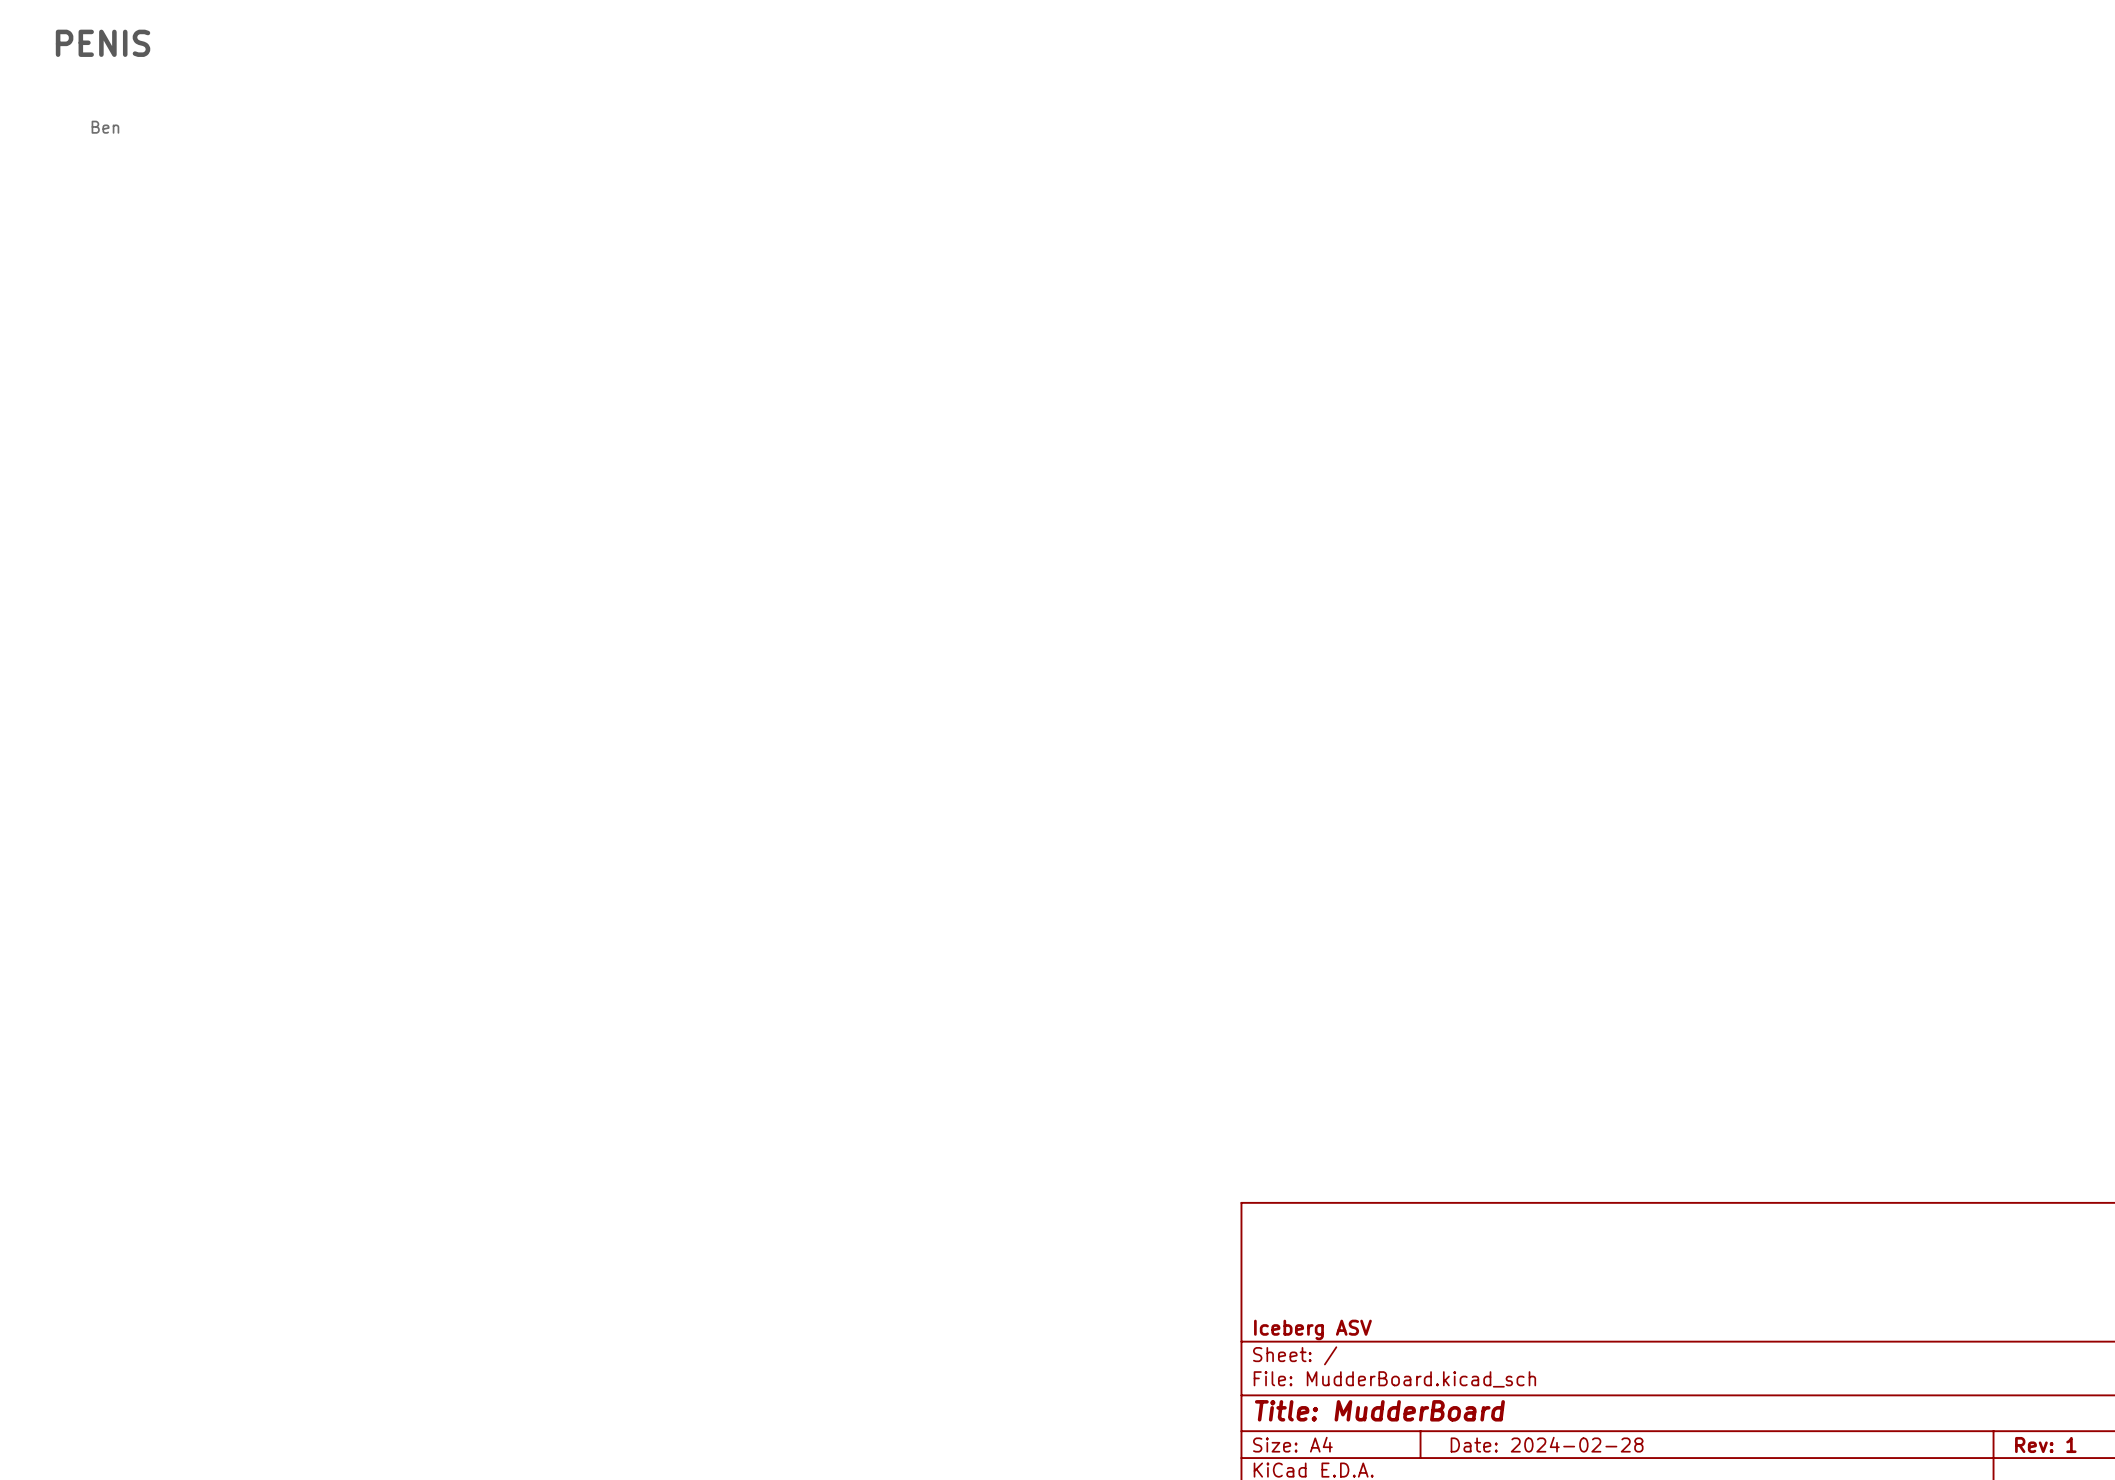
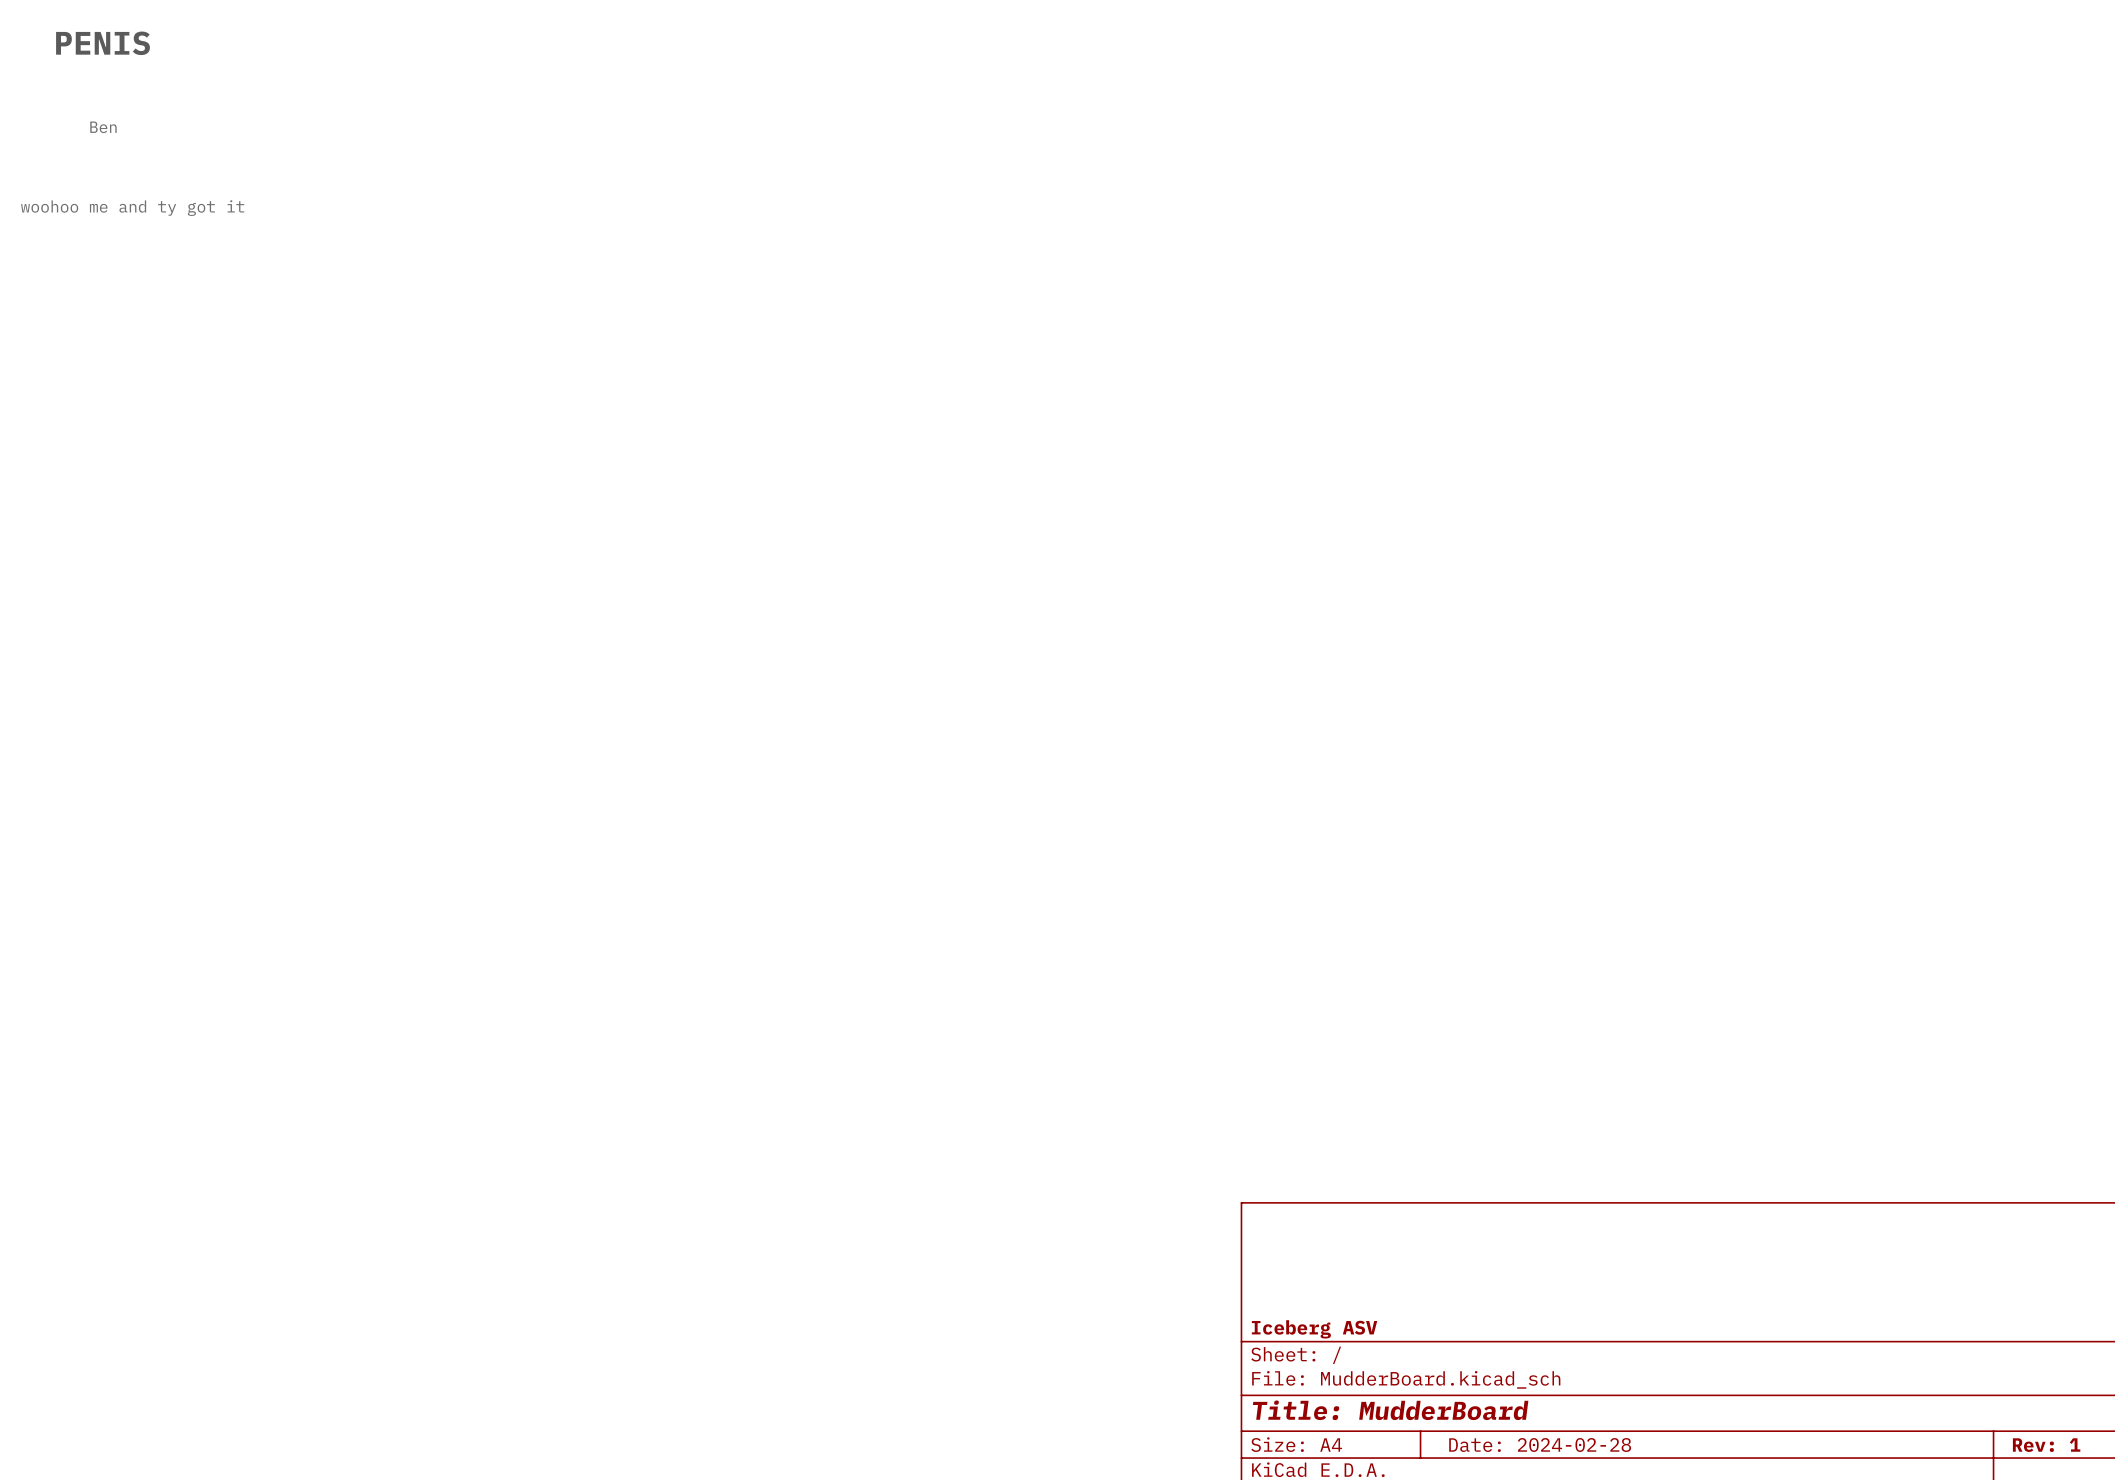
label: none -> woohoo me and ty got it (132, 208)

